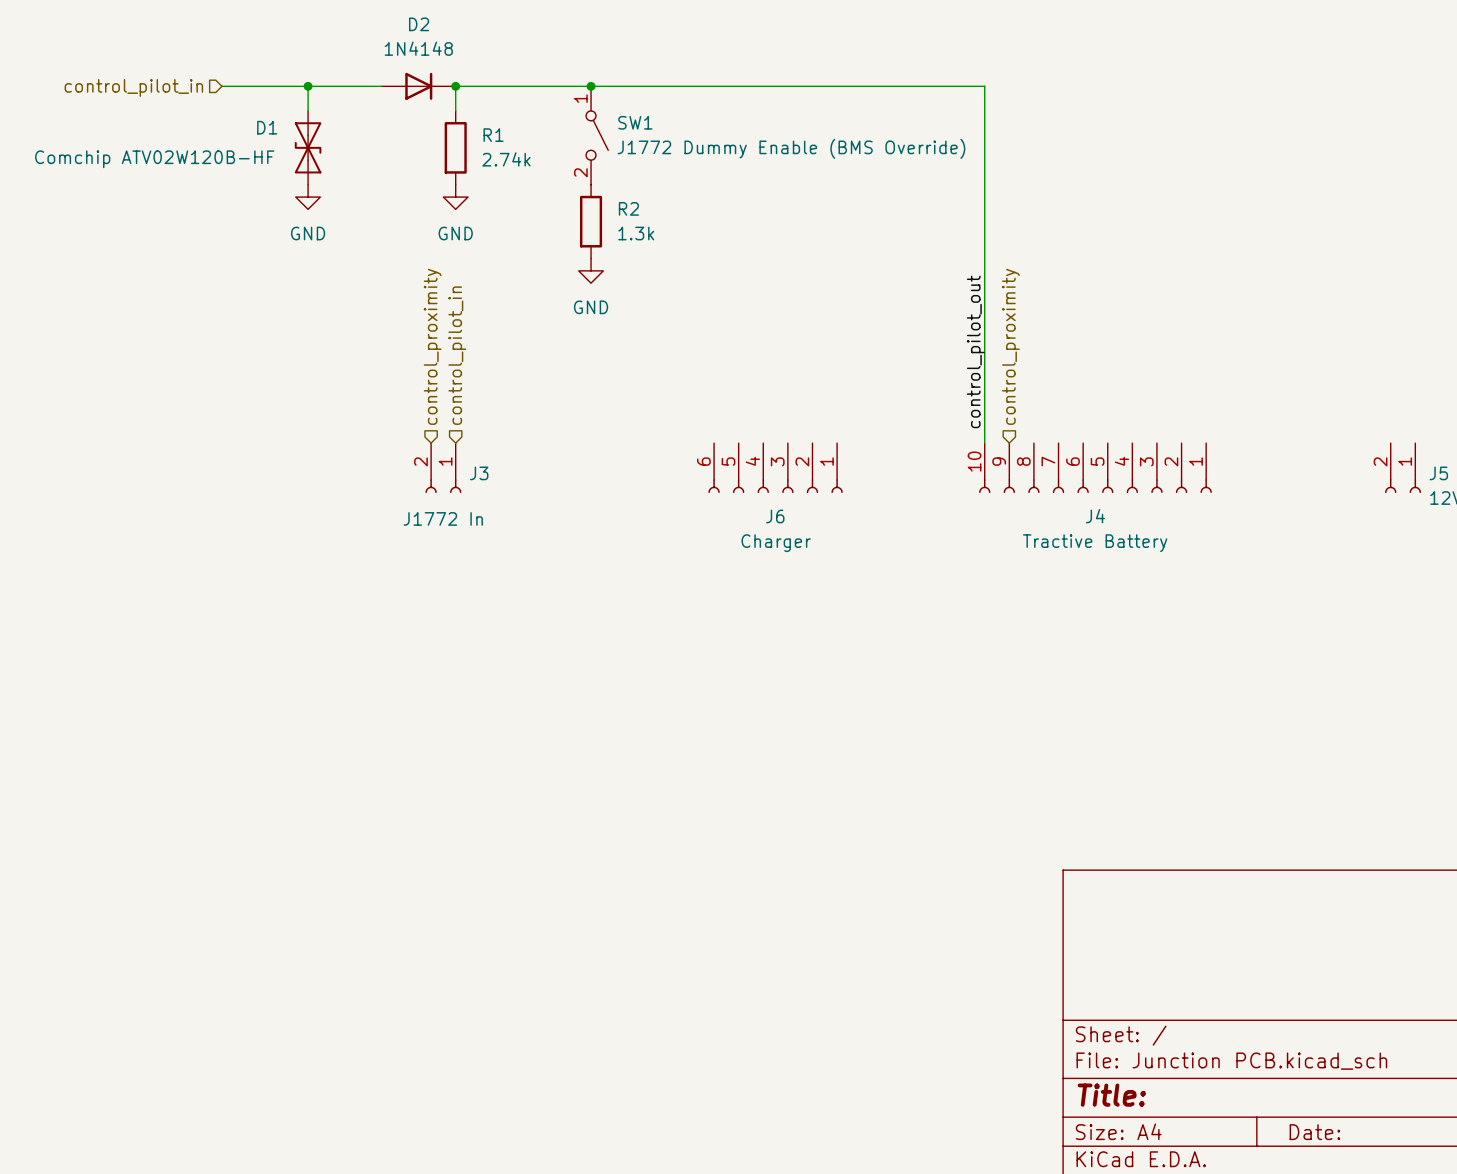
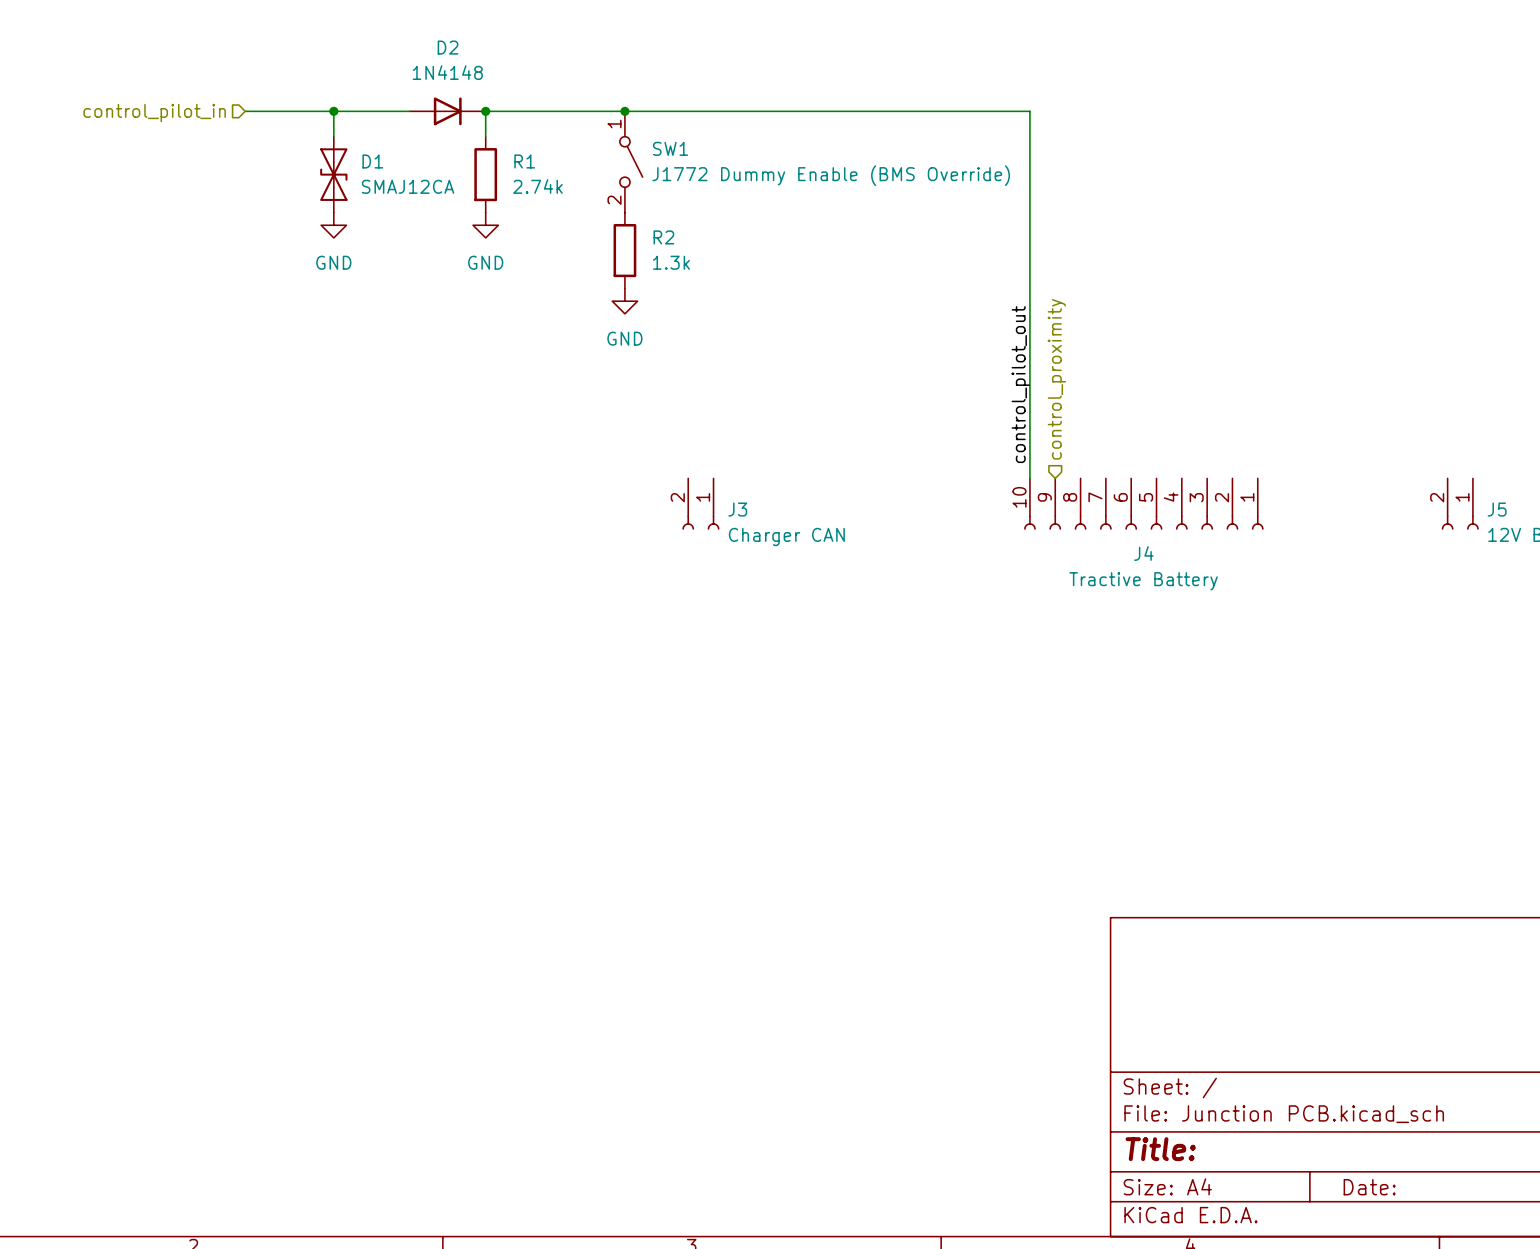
D1 name position: D1 (267, 127) -> D1 (372, 161)
D1 value: Comchip ATV02W120B-HF (154, 159) -> SMAJ12CA (408, 186)
hierarchical label: control_proximity (432, 346) -> none
hierarchical label: control_pilot_in (457, 355) -> none
J3 position: (443, 468) -> (700, 504)
J6: Charger (775, 468) -> none
J3 value: J1772 In (443, 518) -> Charger CAN (786, 536)

